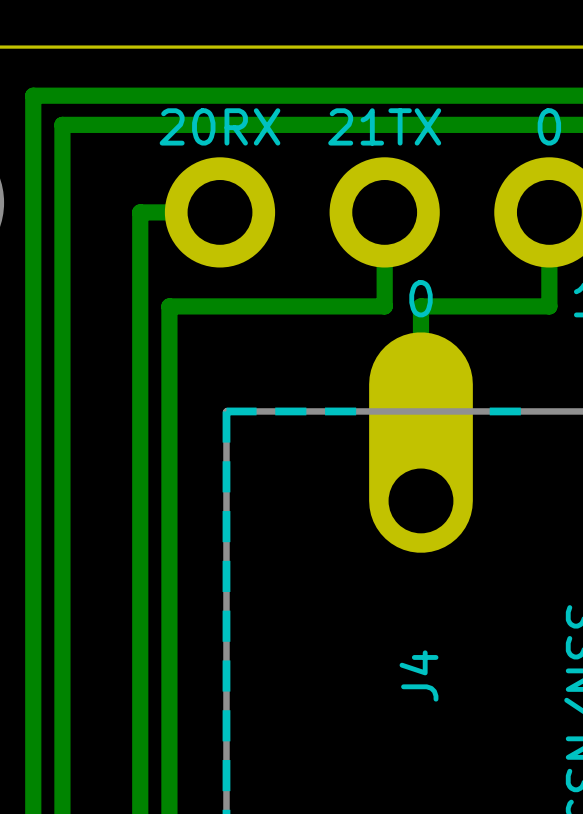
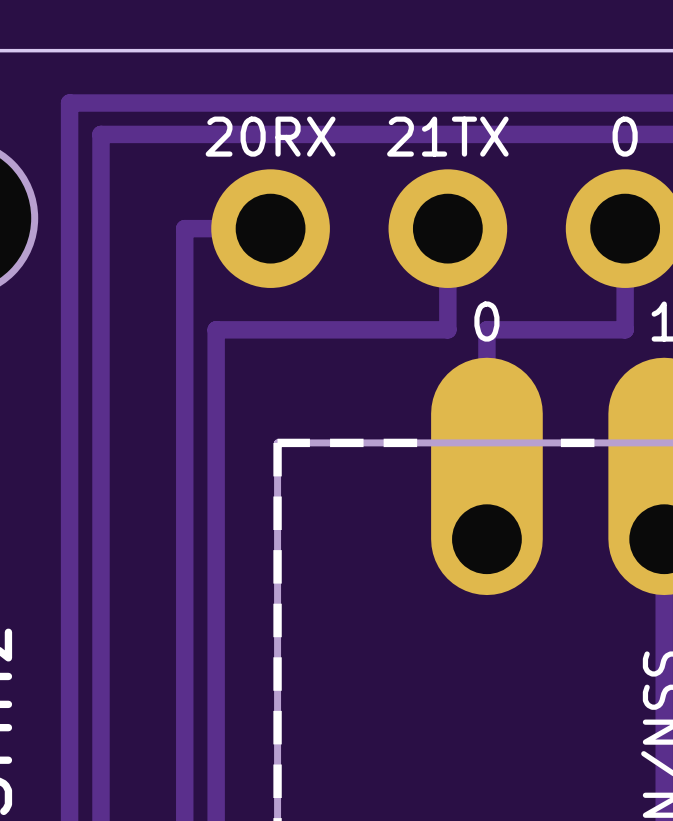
text: J4 (419, 675) -> none

